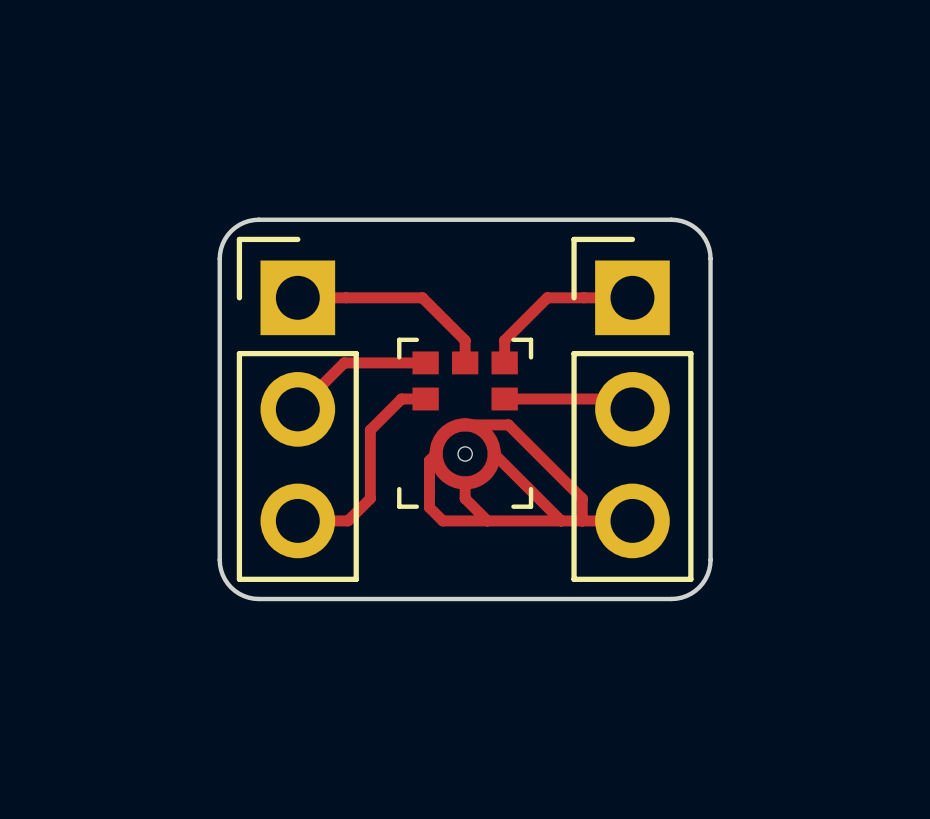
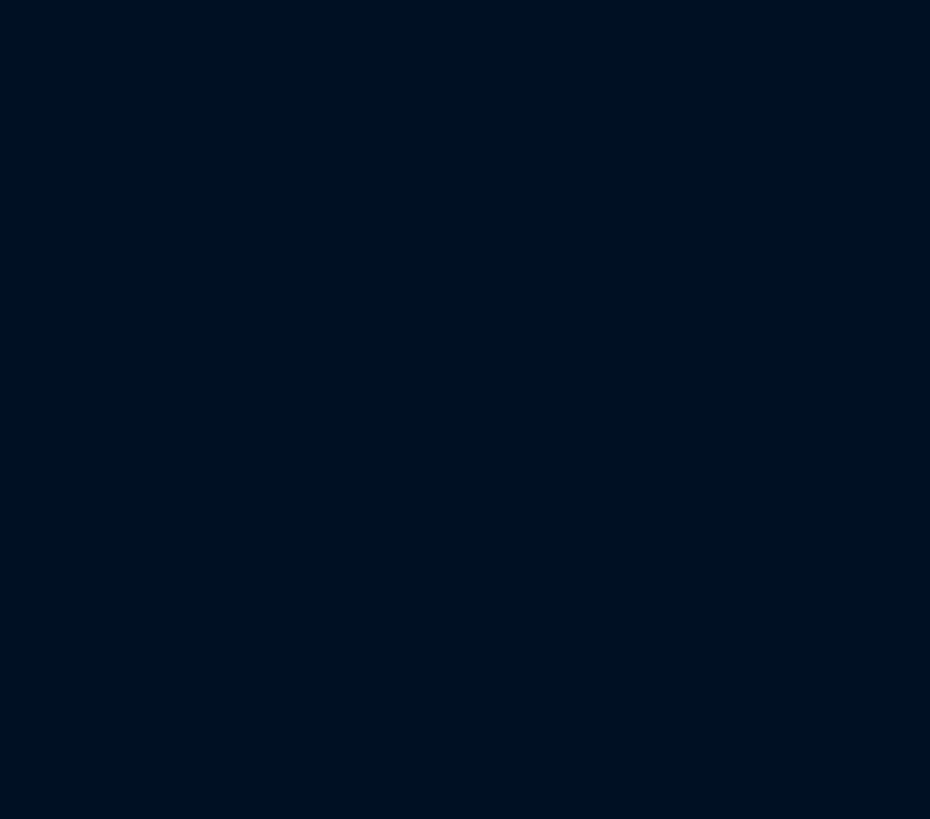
board edge: (258, 219) (671, 219) (686, 222) (695, 227) (707, 243) (710, 258) (710, 559) (707, 574) (702, 583) (691, 593) (671, 599) (258, 599) (243, 596) (235, 590) (222, 574) (219, 559) (219, 258) (222, 243) (231, 231) (243, 222) (258, 219) -> none
track: (297, 297) (422, 297) (465, 340) (465, 362) -> none
track: (632, 297) (547, 297) (504, 340) (504, 362) -> none
track: (425, 362) (344, 362) (297, 409) -> none
track: (425, 399) (401, 399) (370, 430) (370, 498) (348, 520) (297, 520) -> none
track: (504, 399) (622, 399) (632, 409) -> none
part: (297, 409) -> none
part: (632, 409) -> none
drawing: [429, 418, 501, 490] -> none
part: (465, 423) -> none
track: (465, 424) (508, 424) (582, 498) (582, 520) -> none
track: (436, 453) (429, 460) (429, 507) (442, 520) (632, 520) -> none
track: (494, 453) (561, 520) -> none
track: (465, 483) (465, 498) (487, 520) -> none

